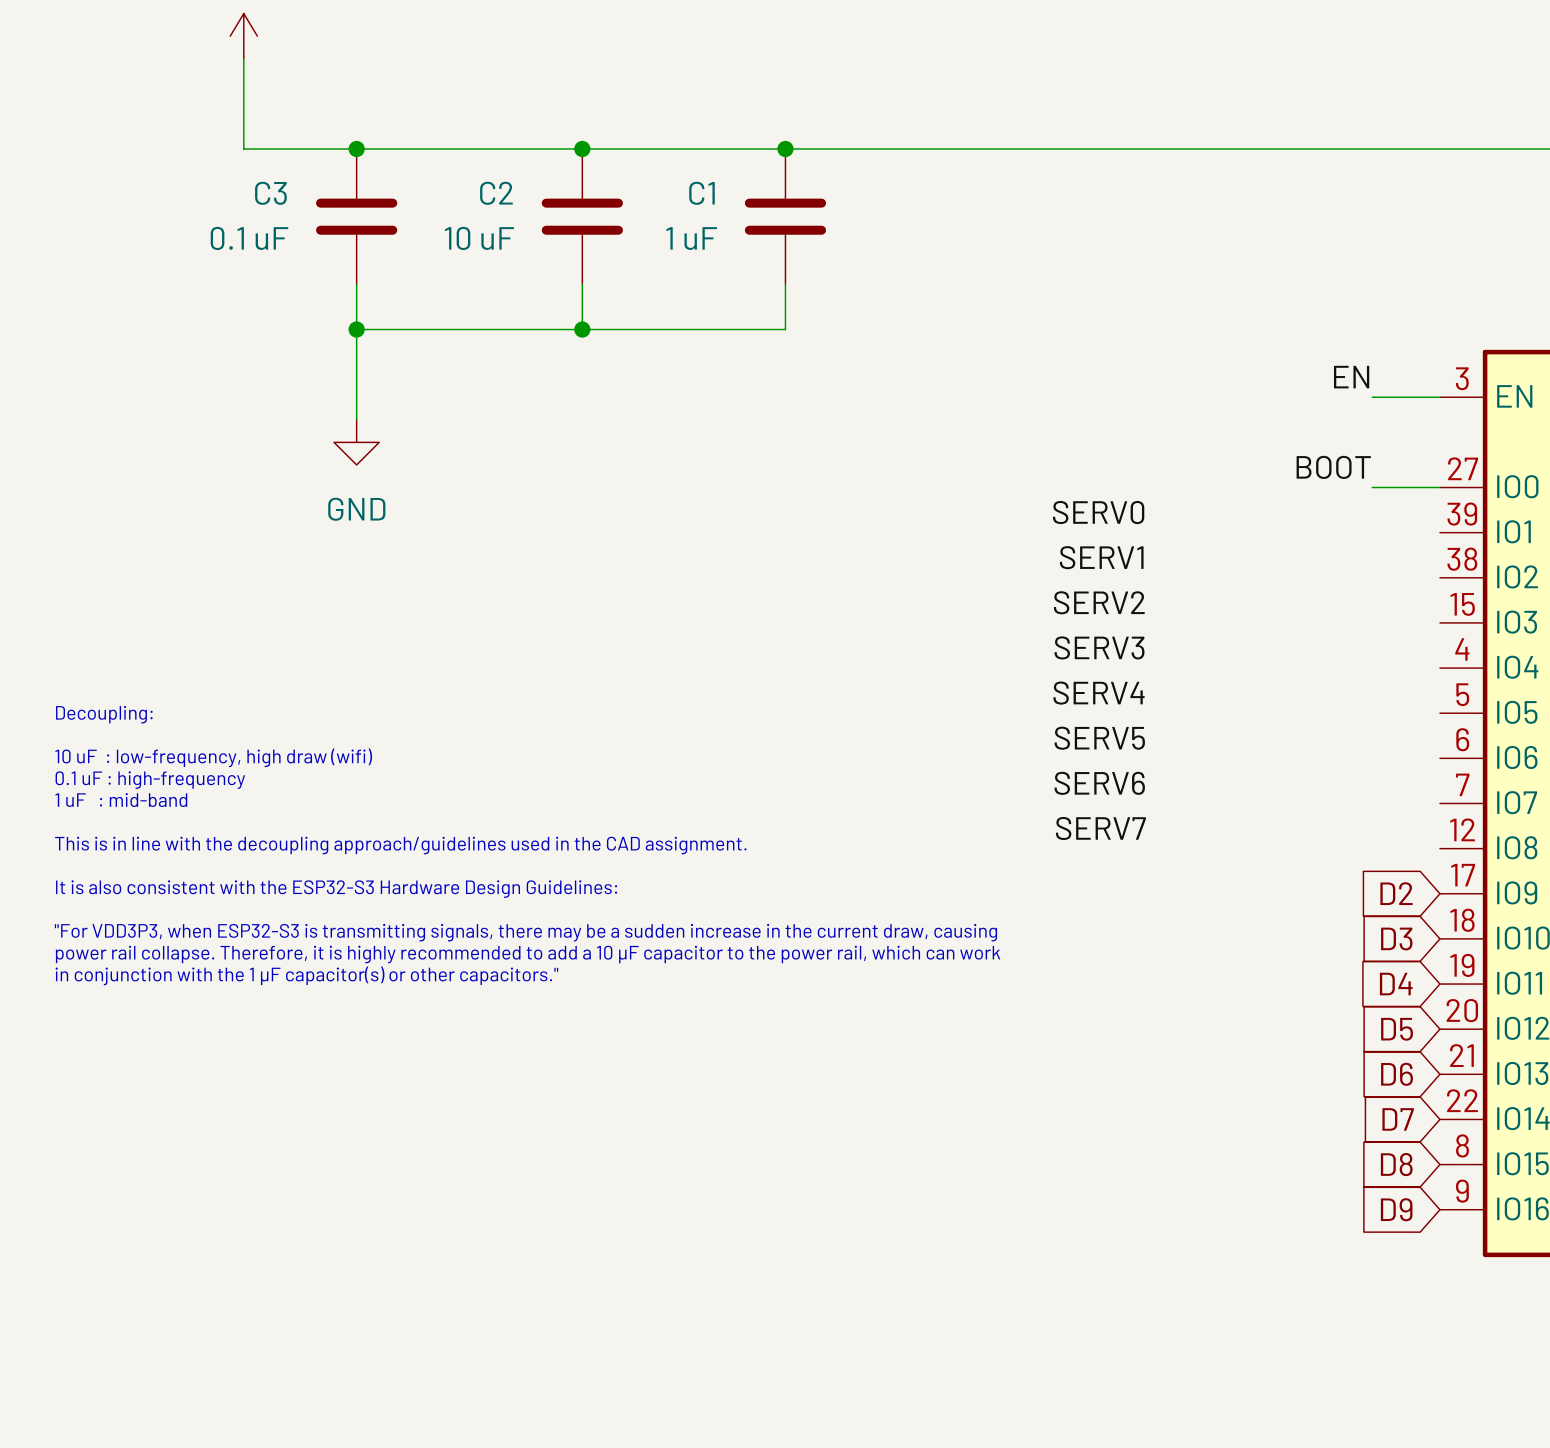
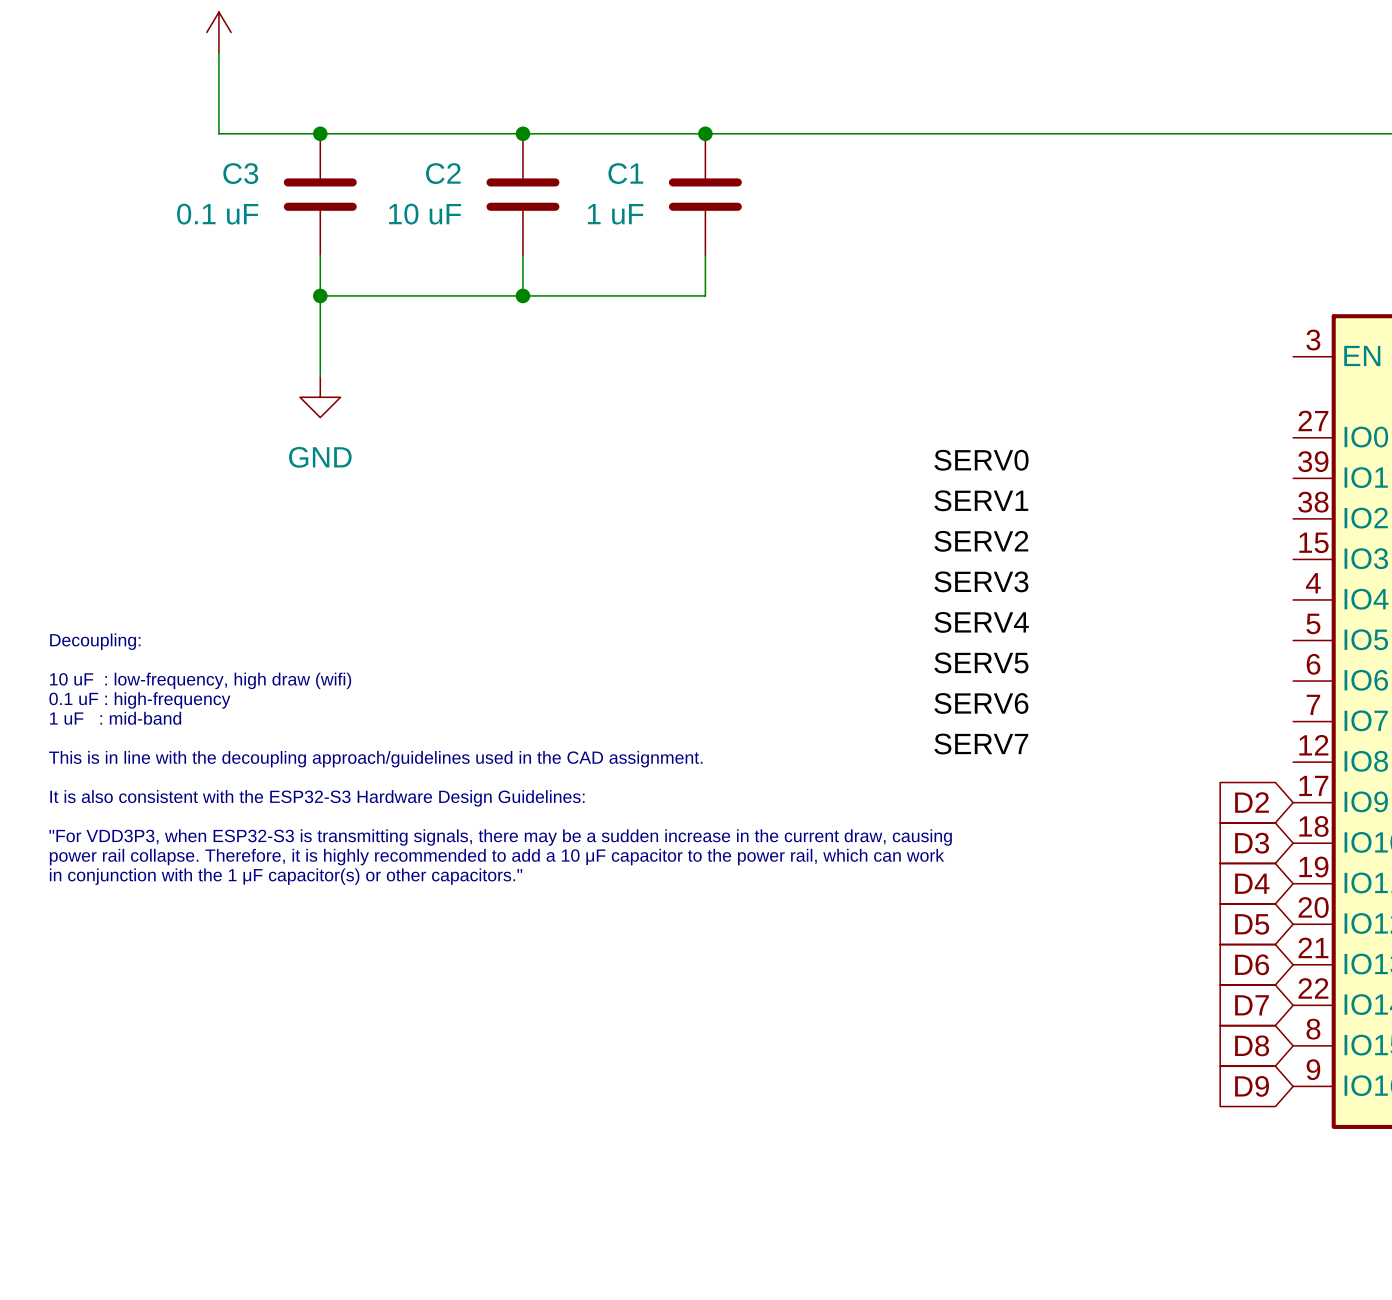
label: EN (1351, 377) -> none
wire: (1372, 397) (1439, 397) -> none
label: BOOT (1333, 467) -> none
wire: (1372, 487) (1439, 487) -> none

